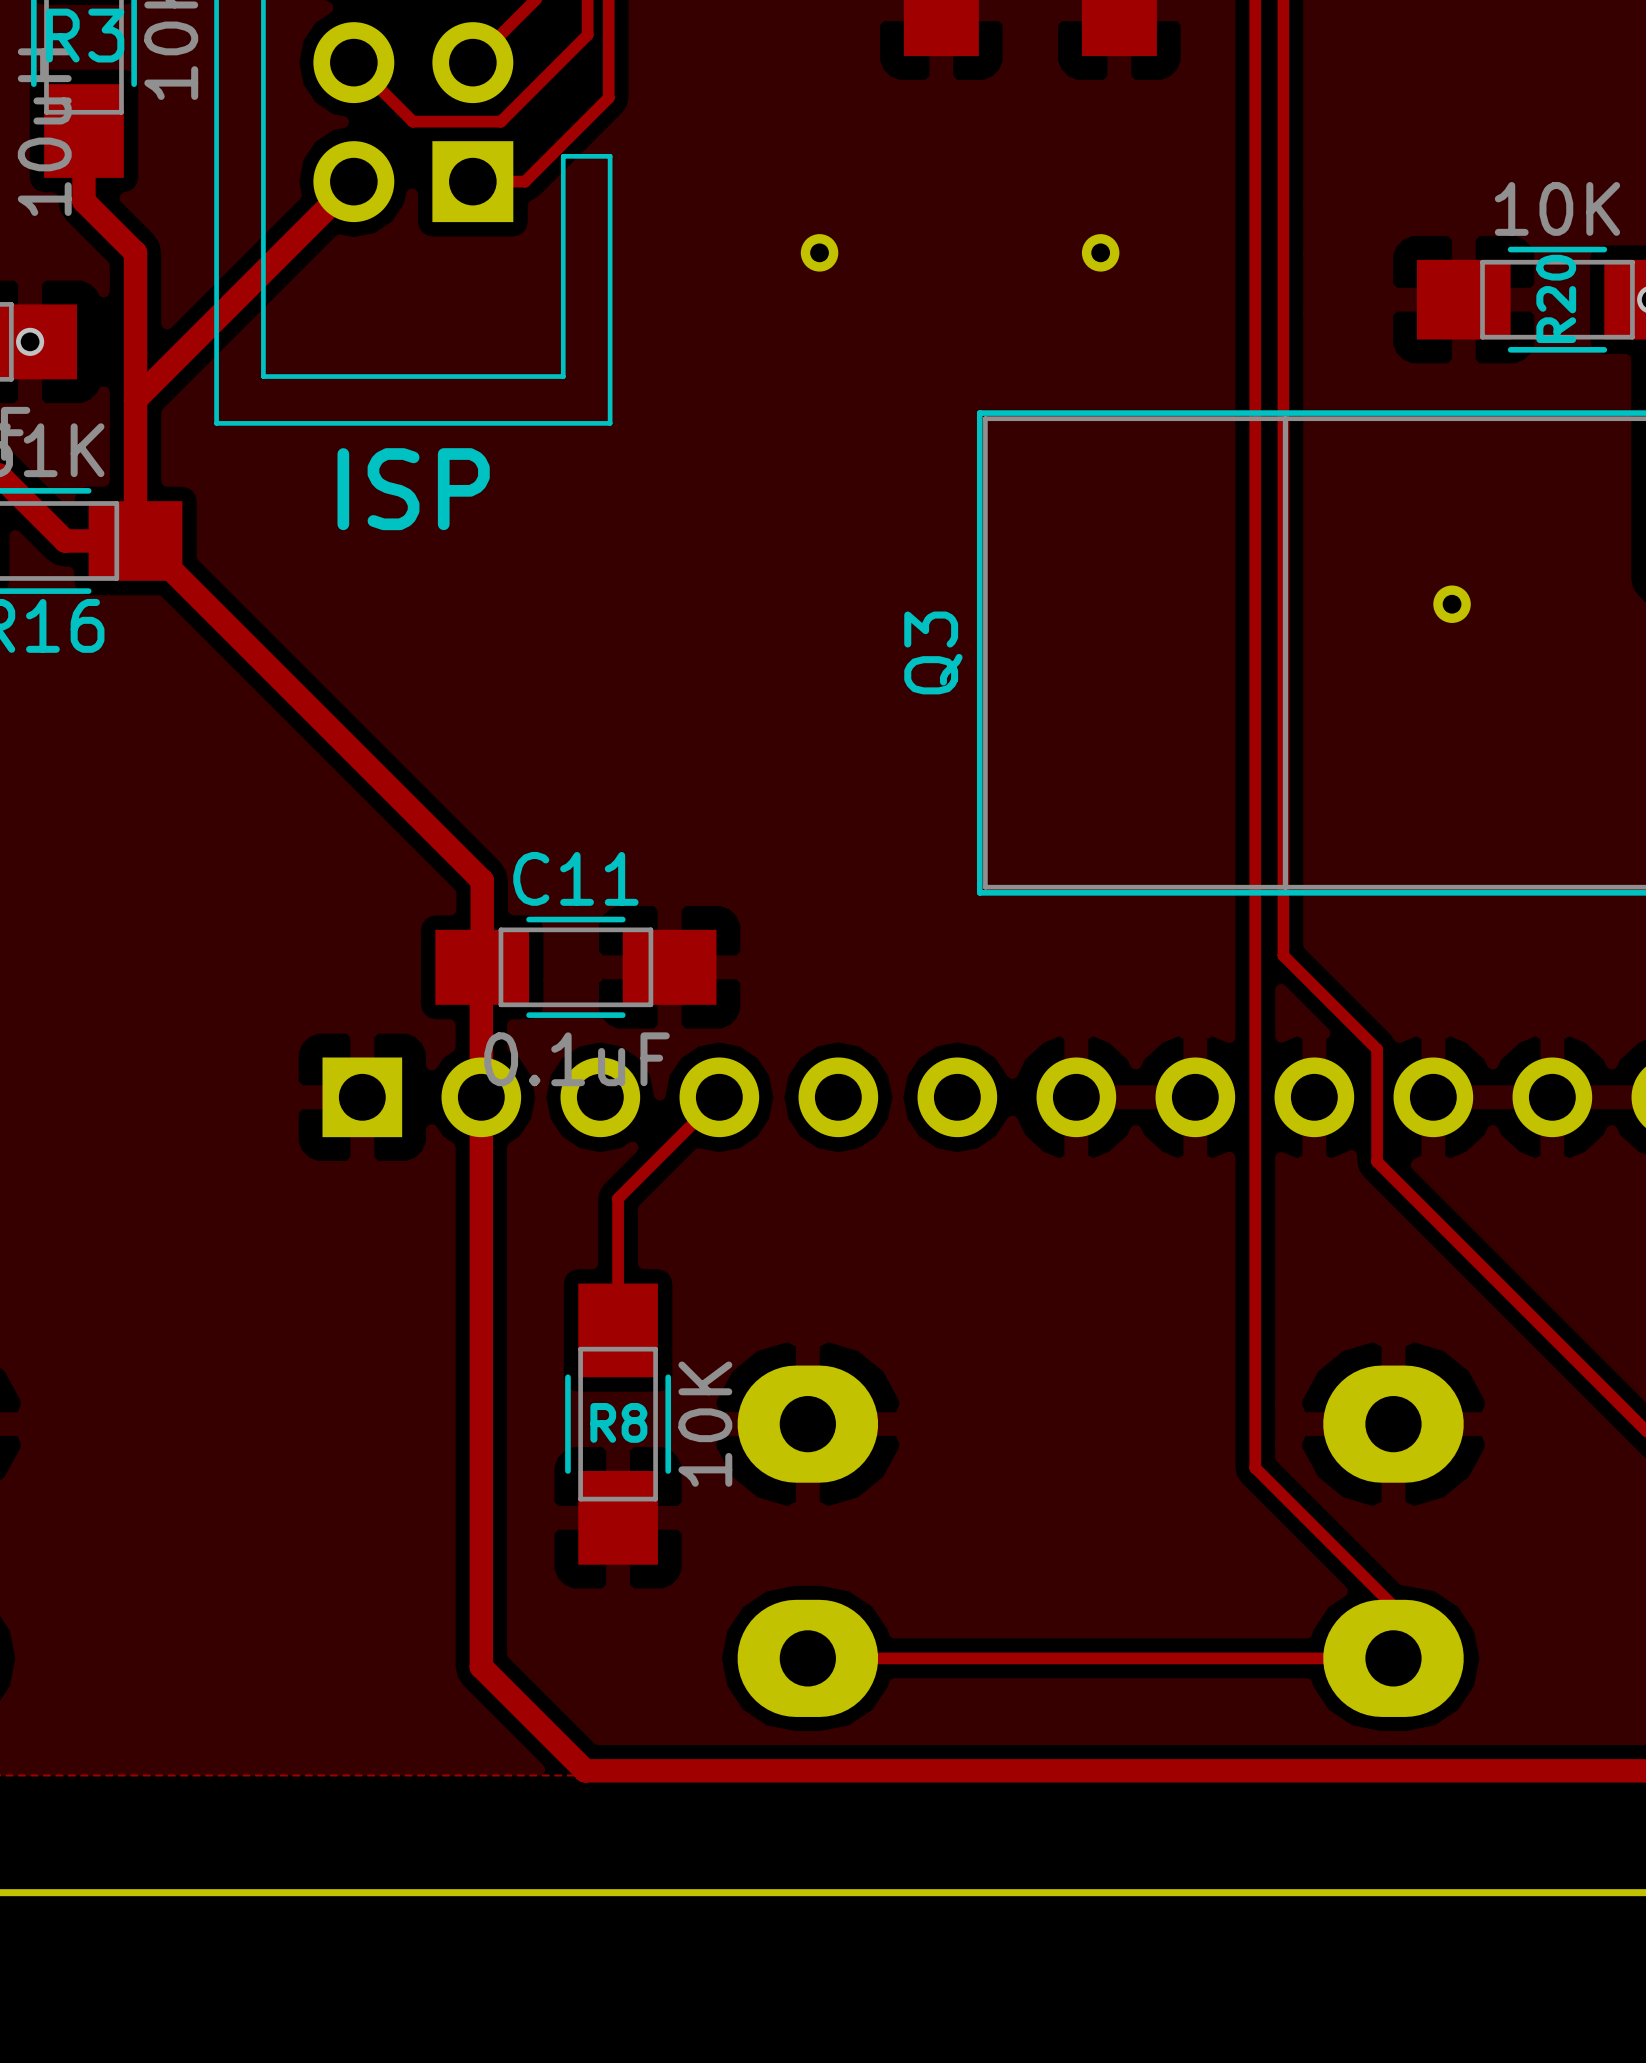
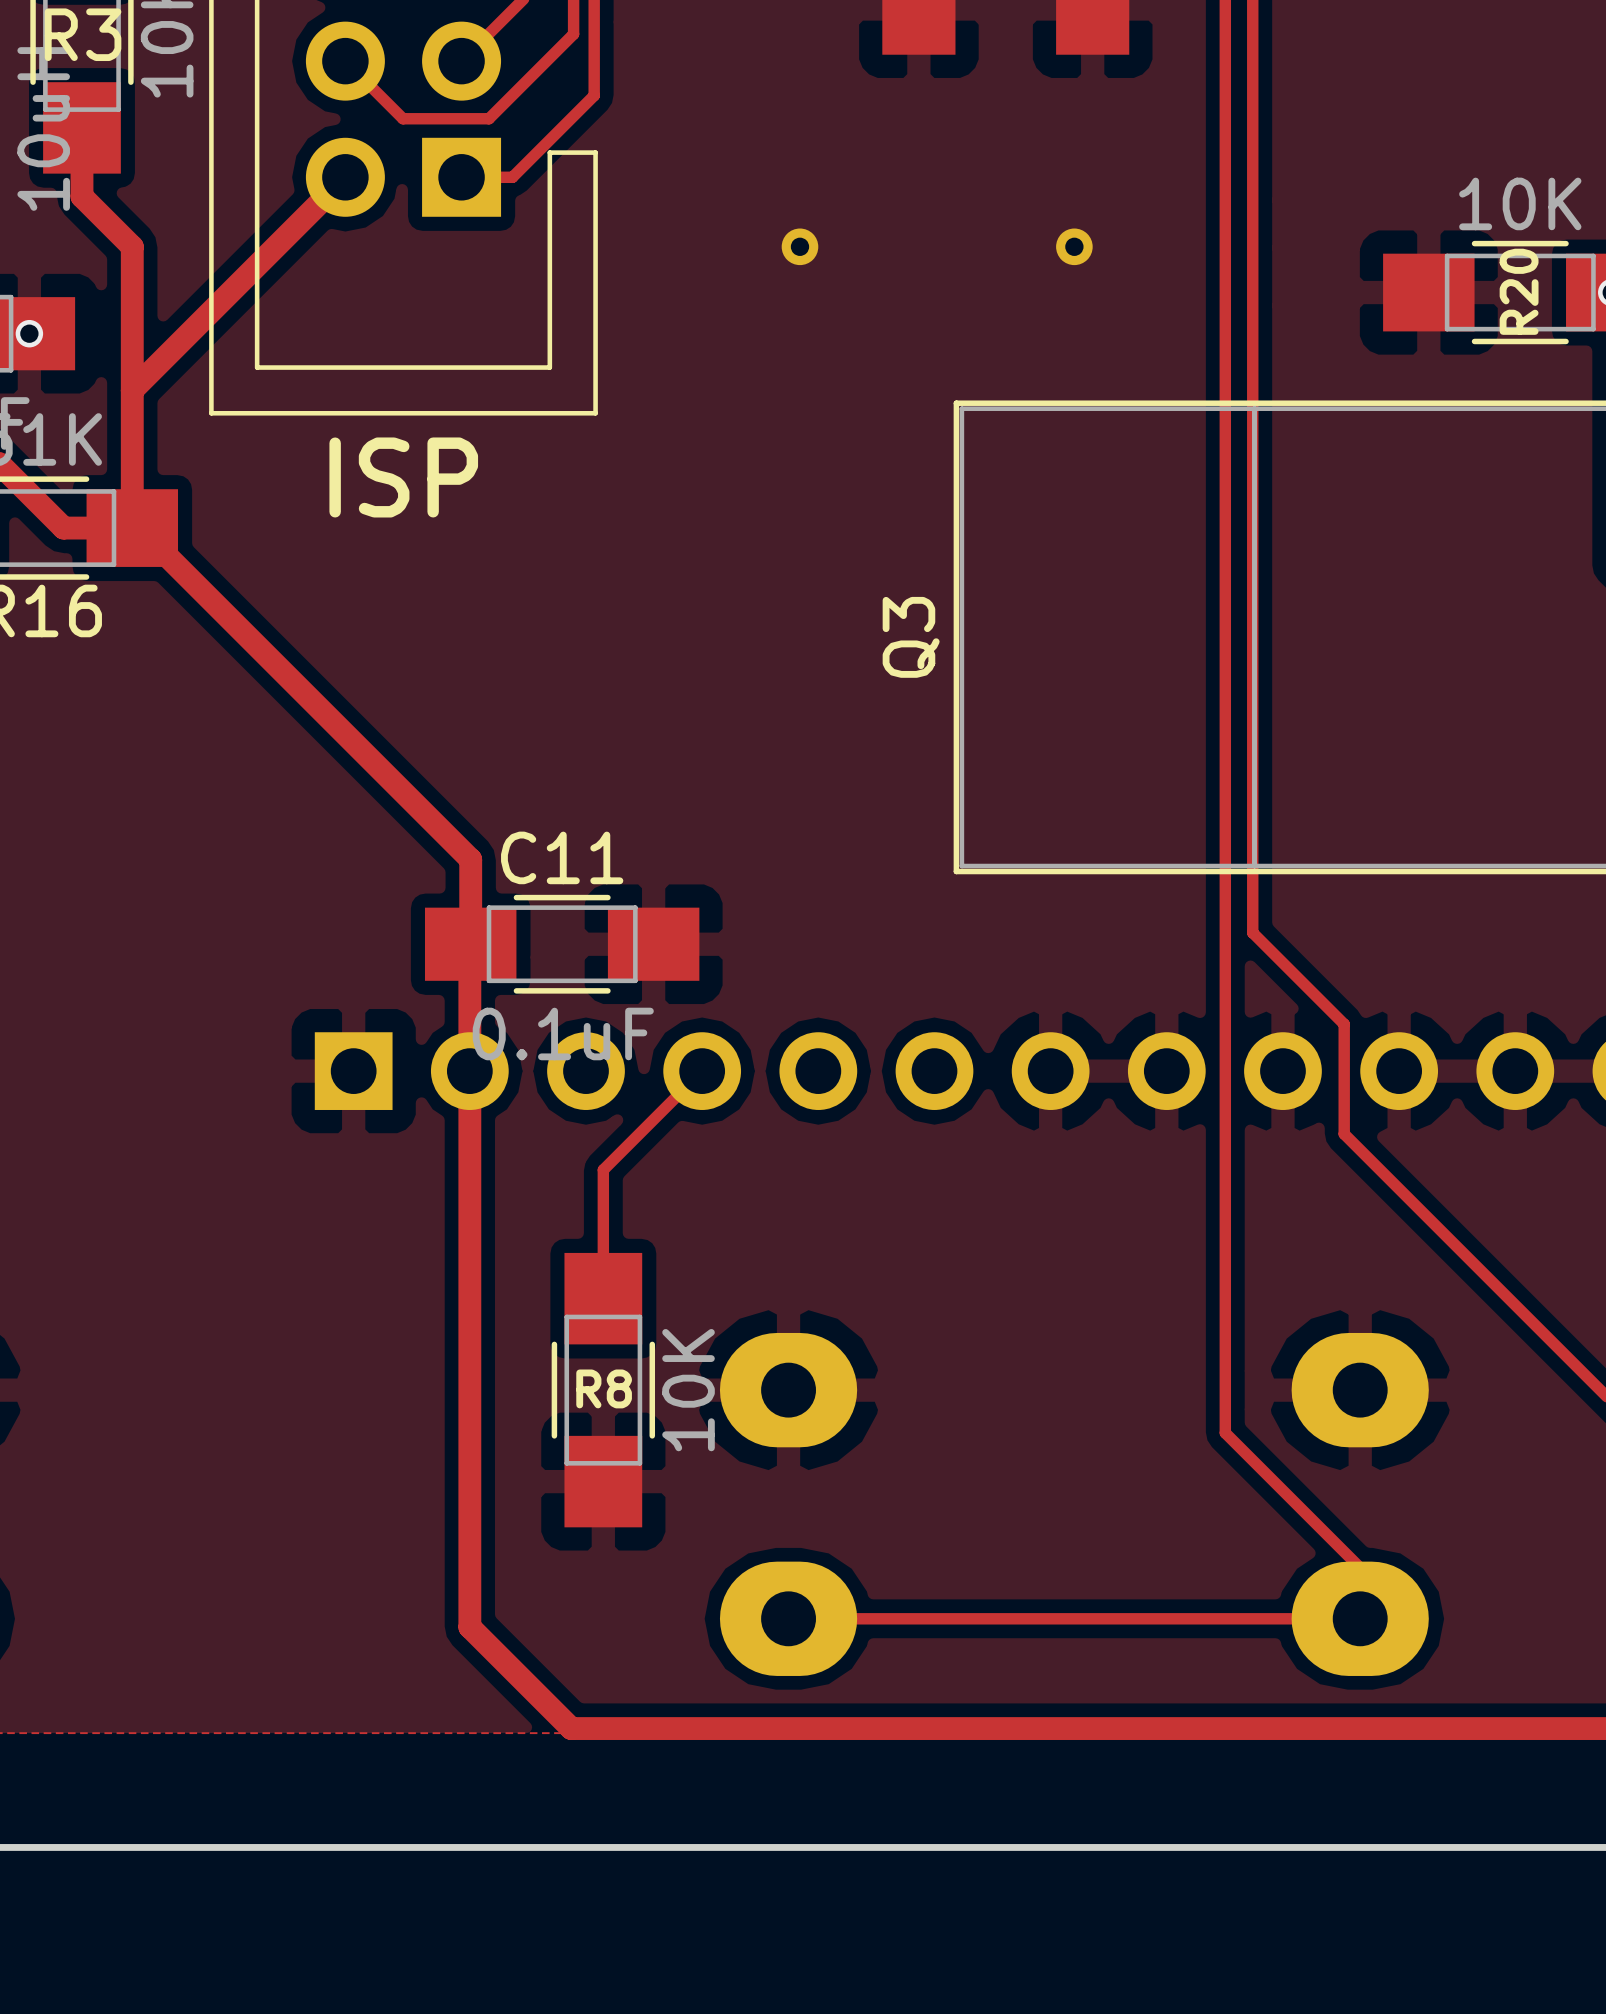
part: (1452, 604) -> none

